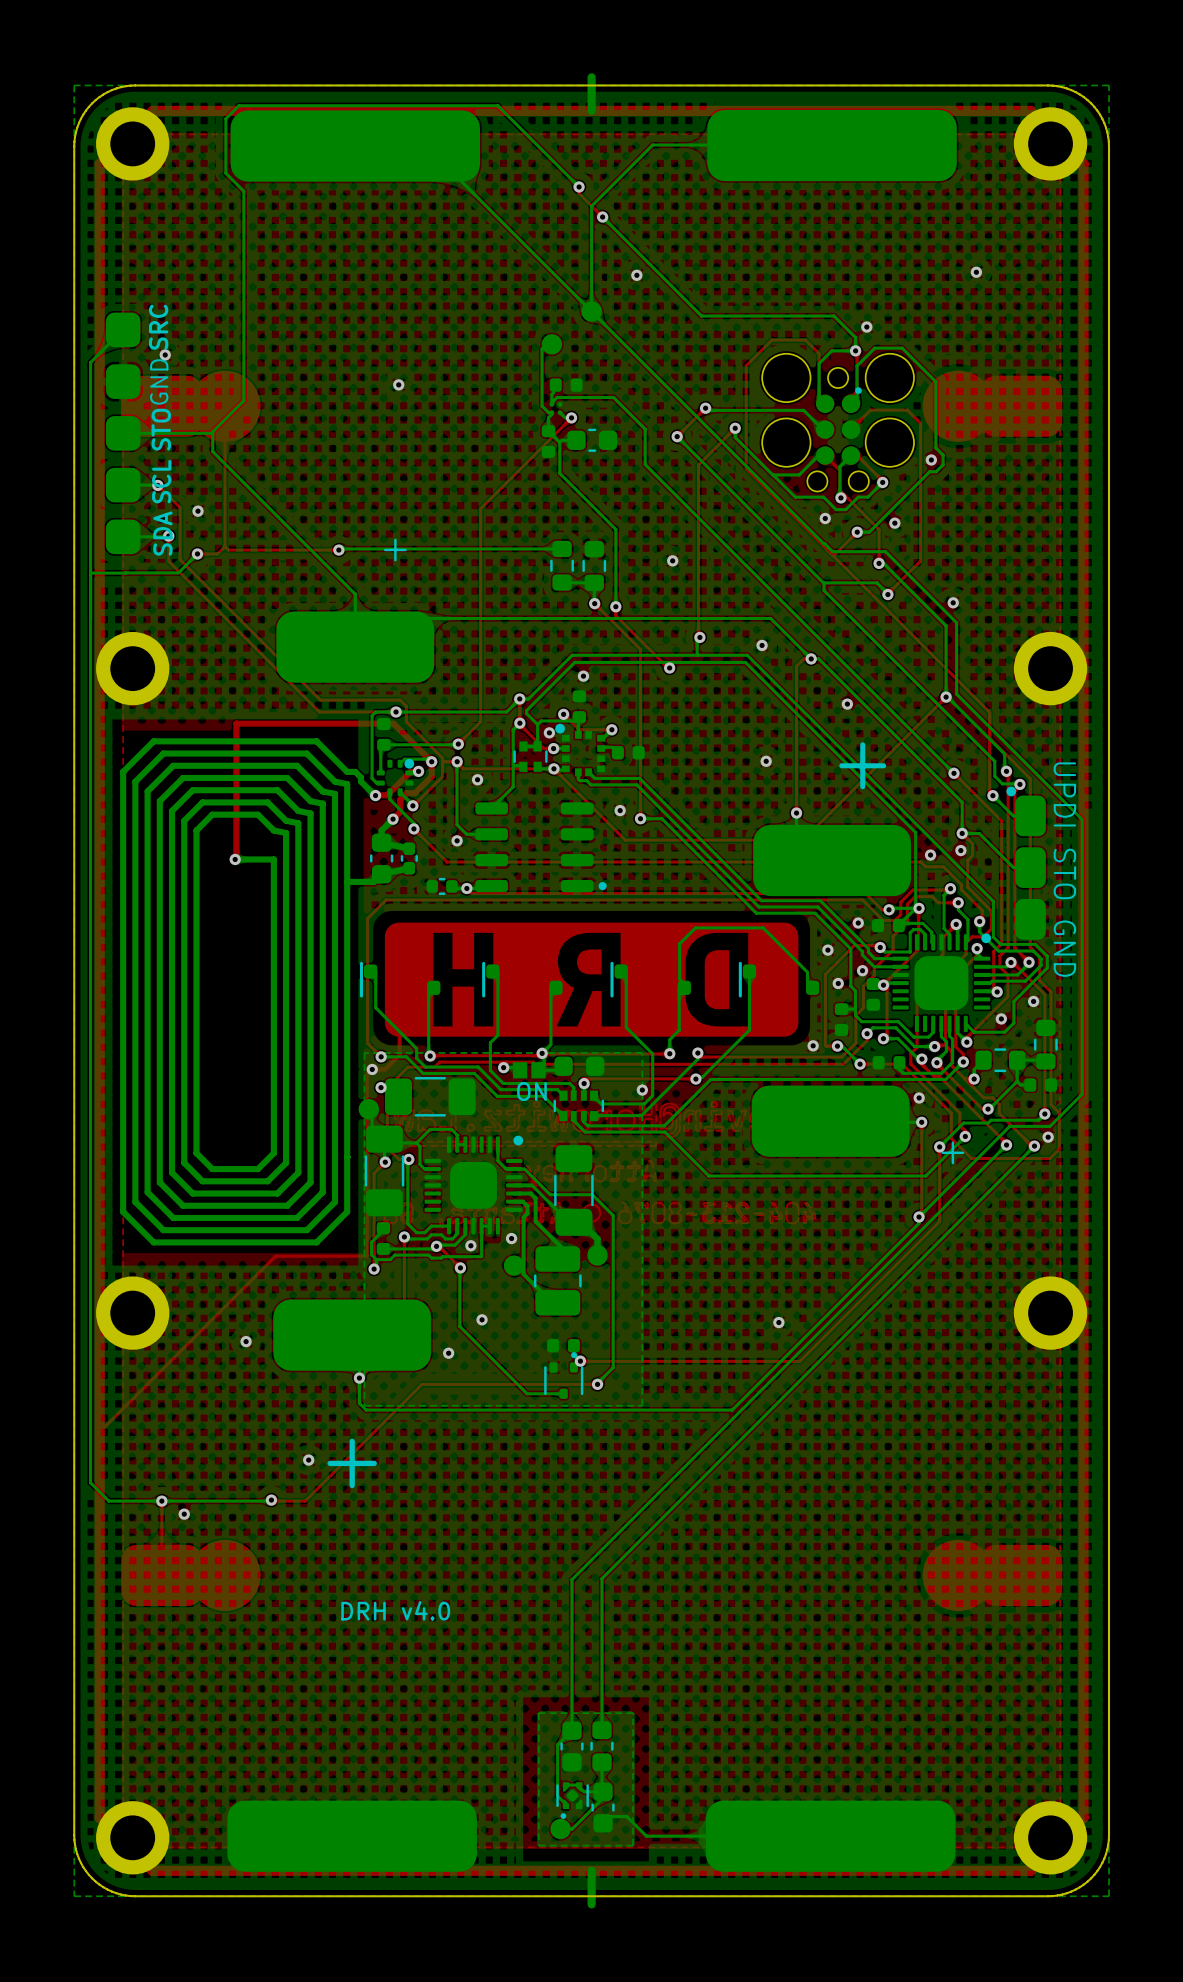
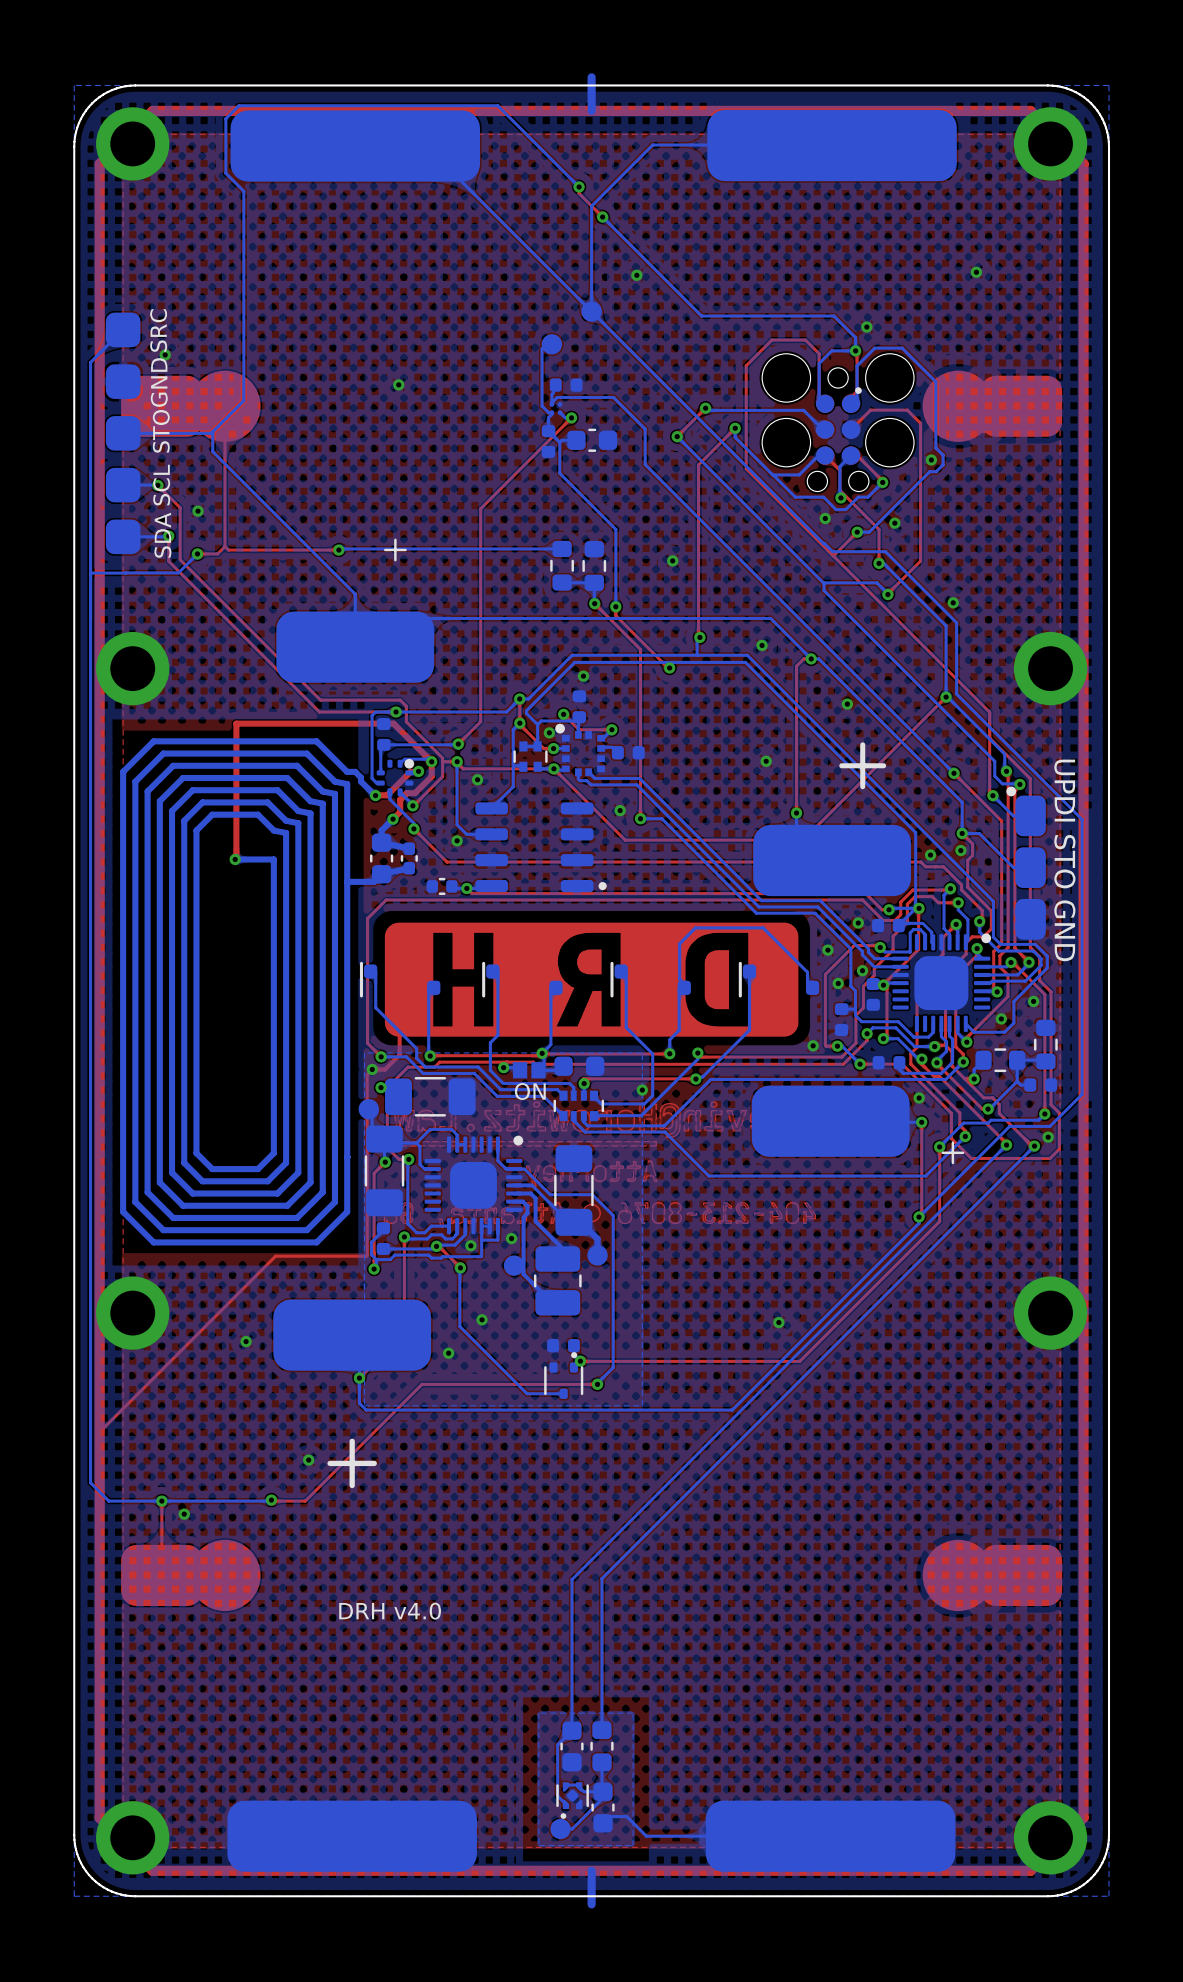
bottom track: none -> (497, 1226) (497, 1240) (481, 1240)

